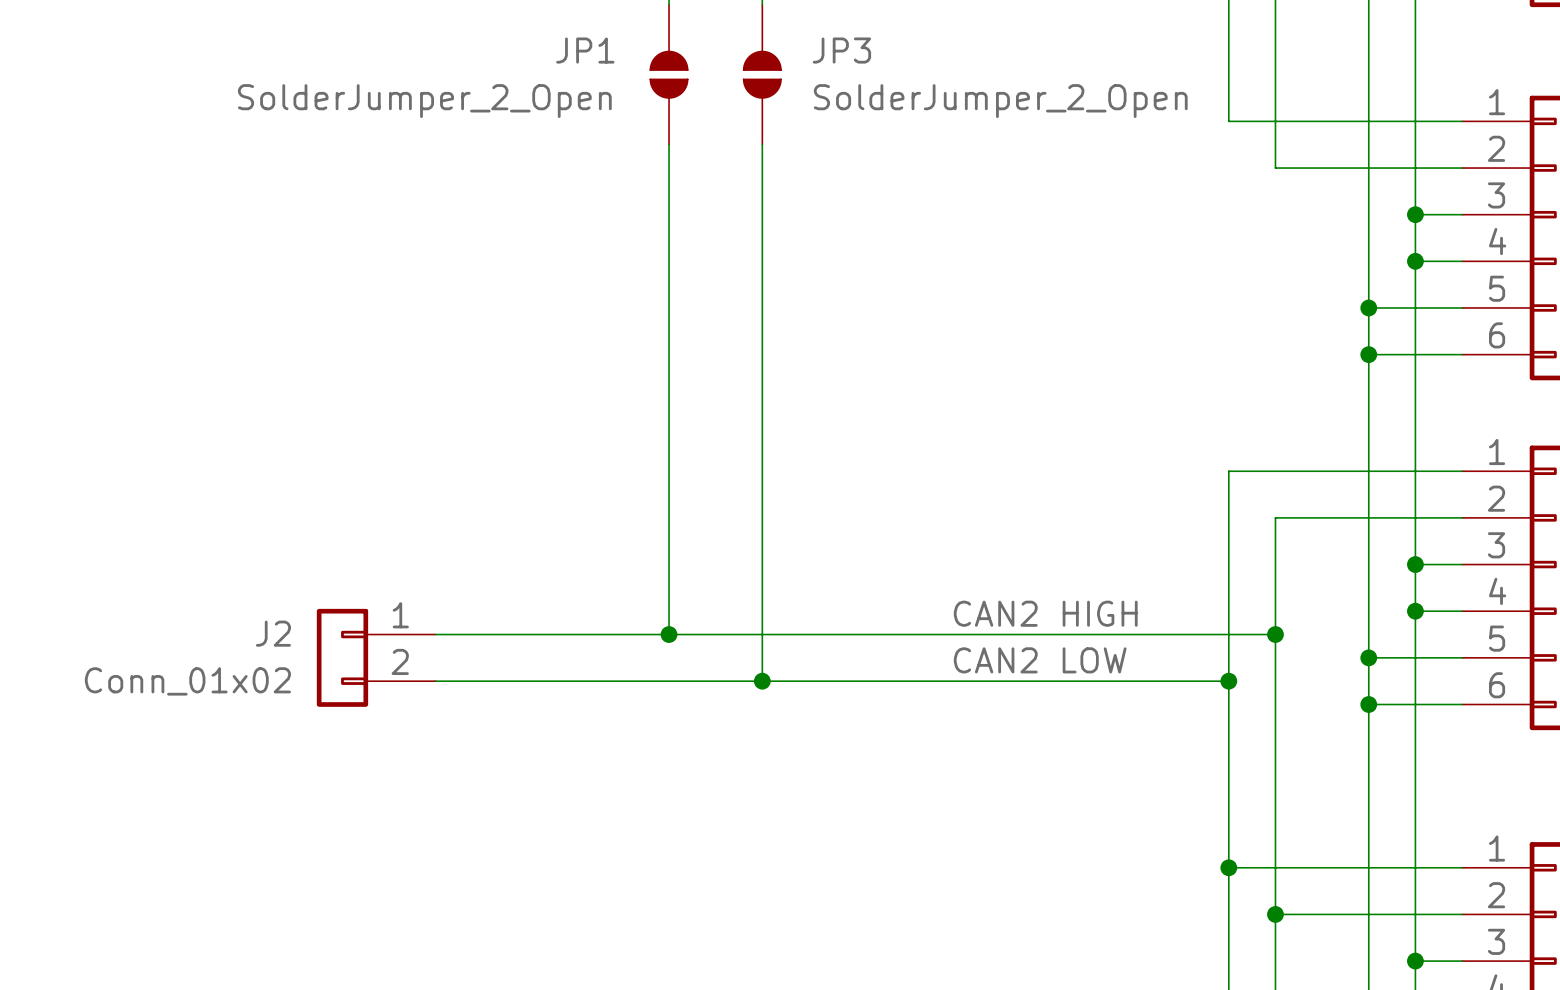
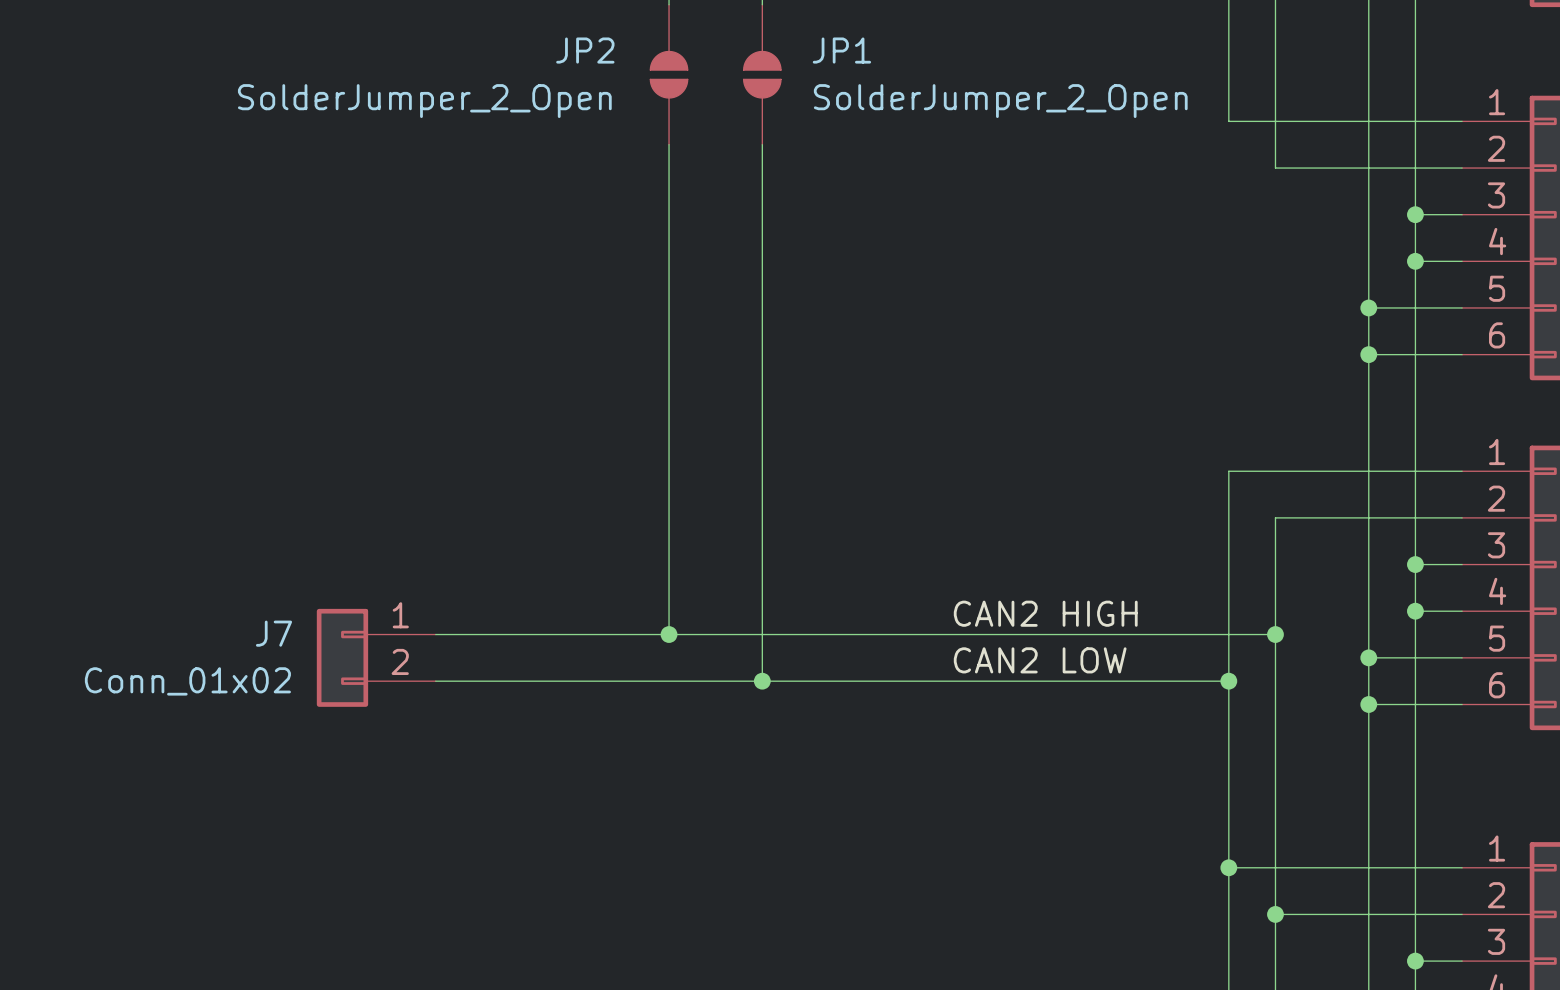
JP1 name: JP1 (585, 50) -> JP2 (585, 50)
JP3 name: JP3 (841, 50) -> JP1 (841, 50)
J2 name: J2 (273, 633) -> J7 (273, 633)

